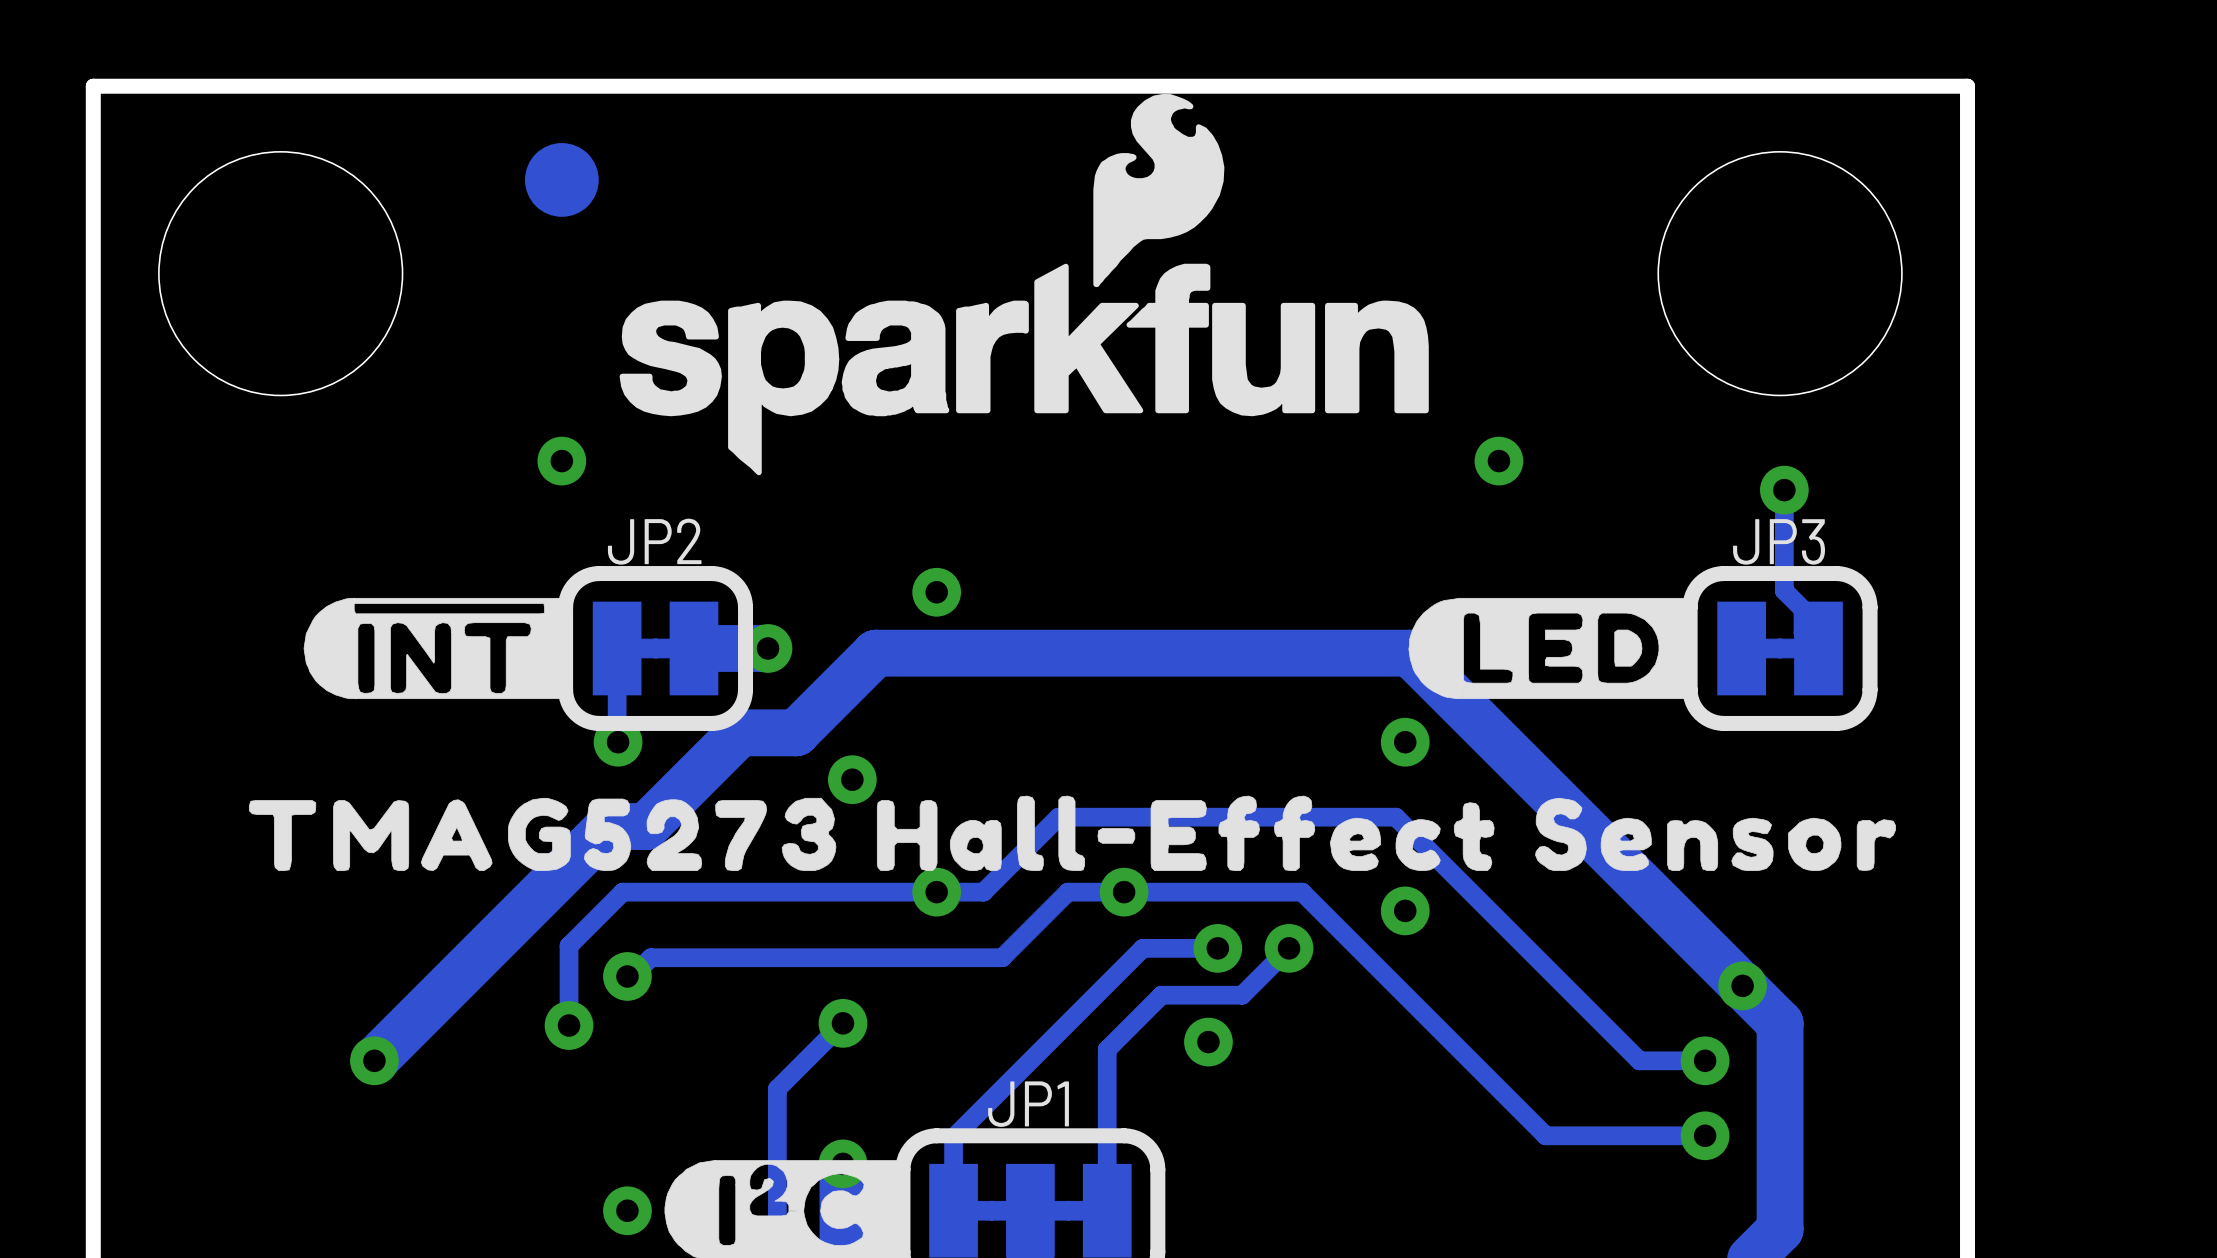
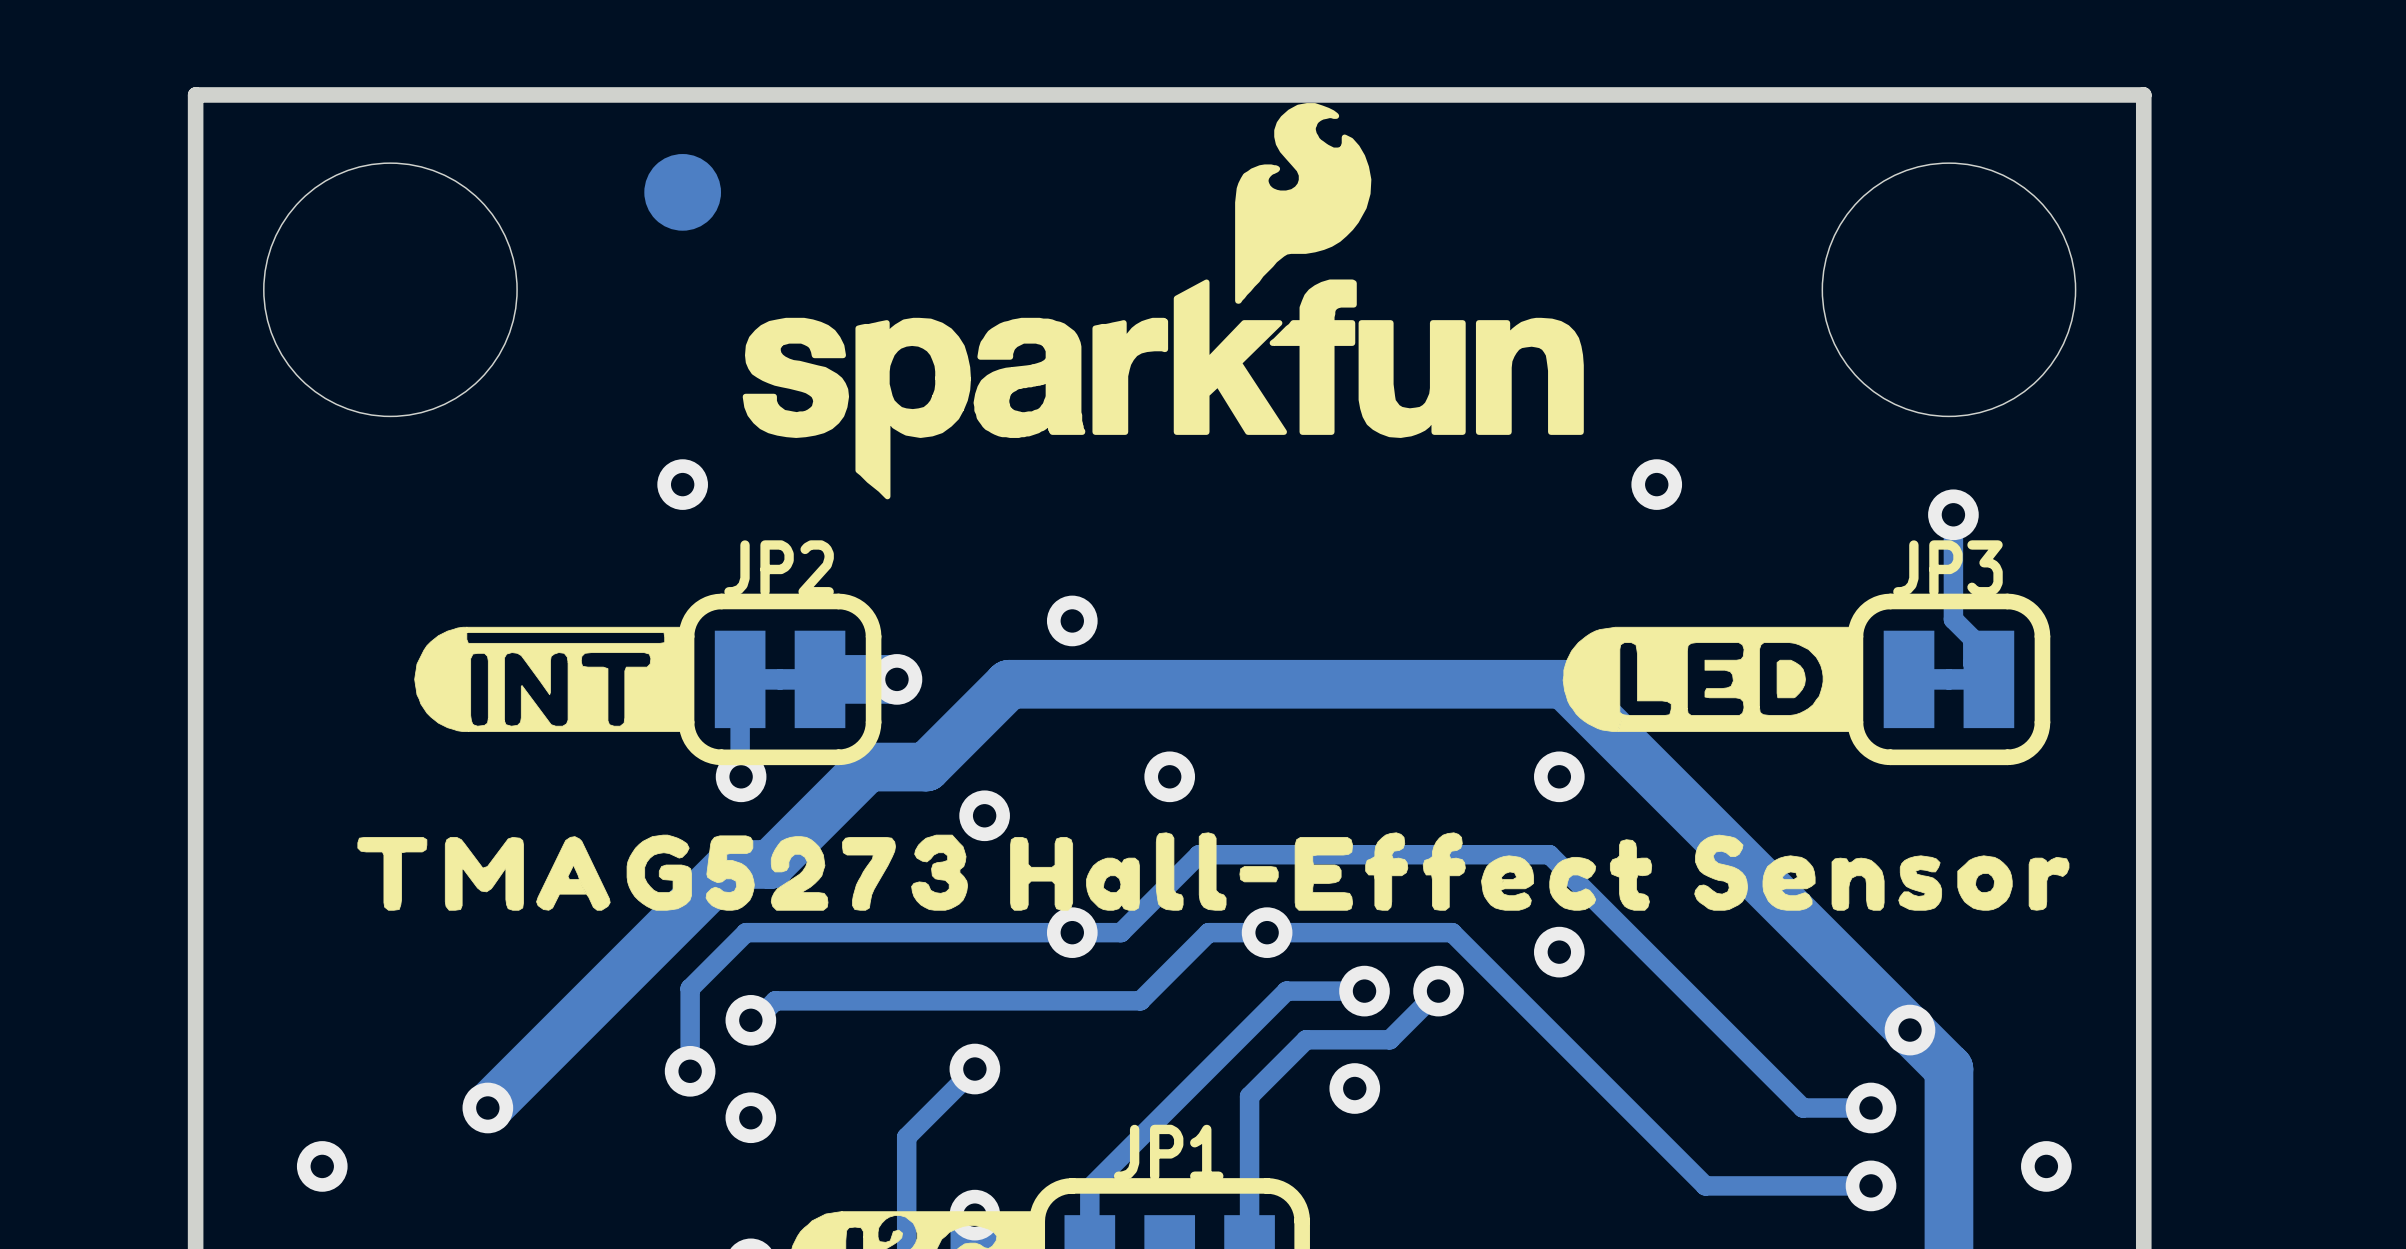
via: none -> (1169, 776)
via: none -> (750, 1117)
via: none -> (322, 1166)
via: none -> (2046, 1166)

